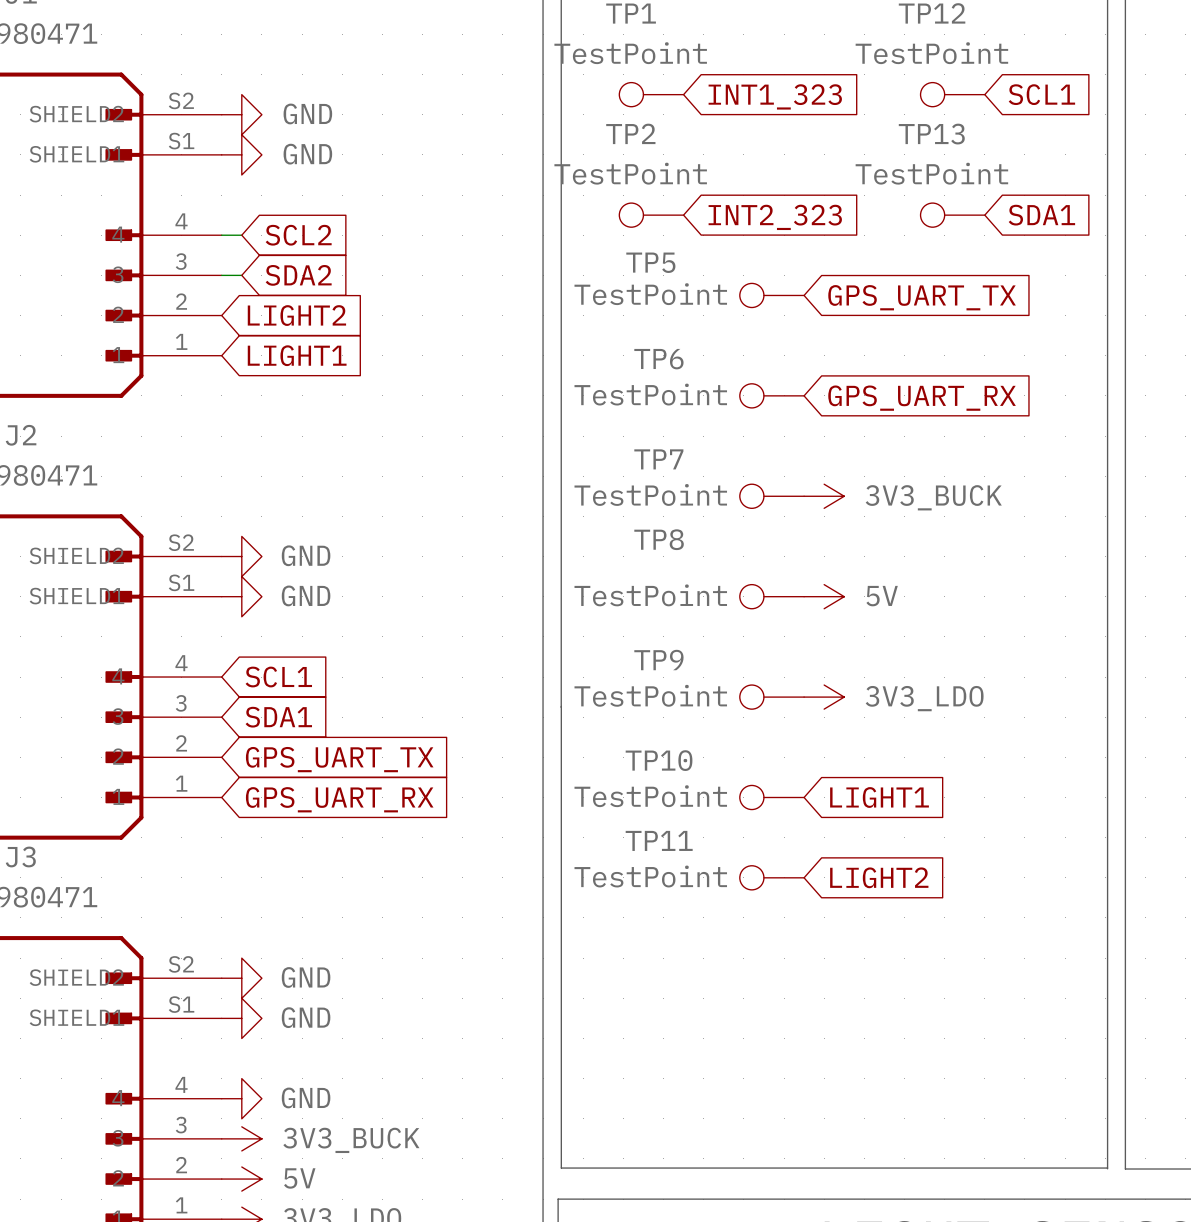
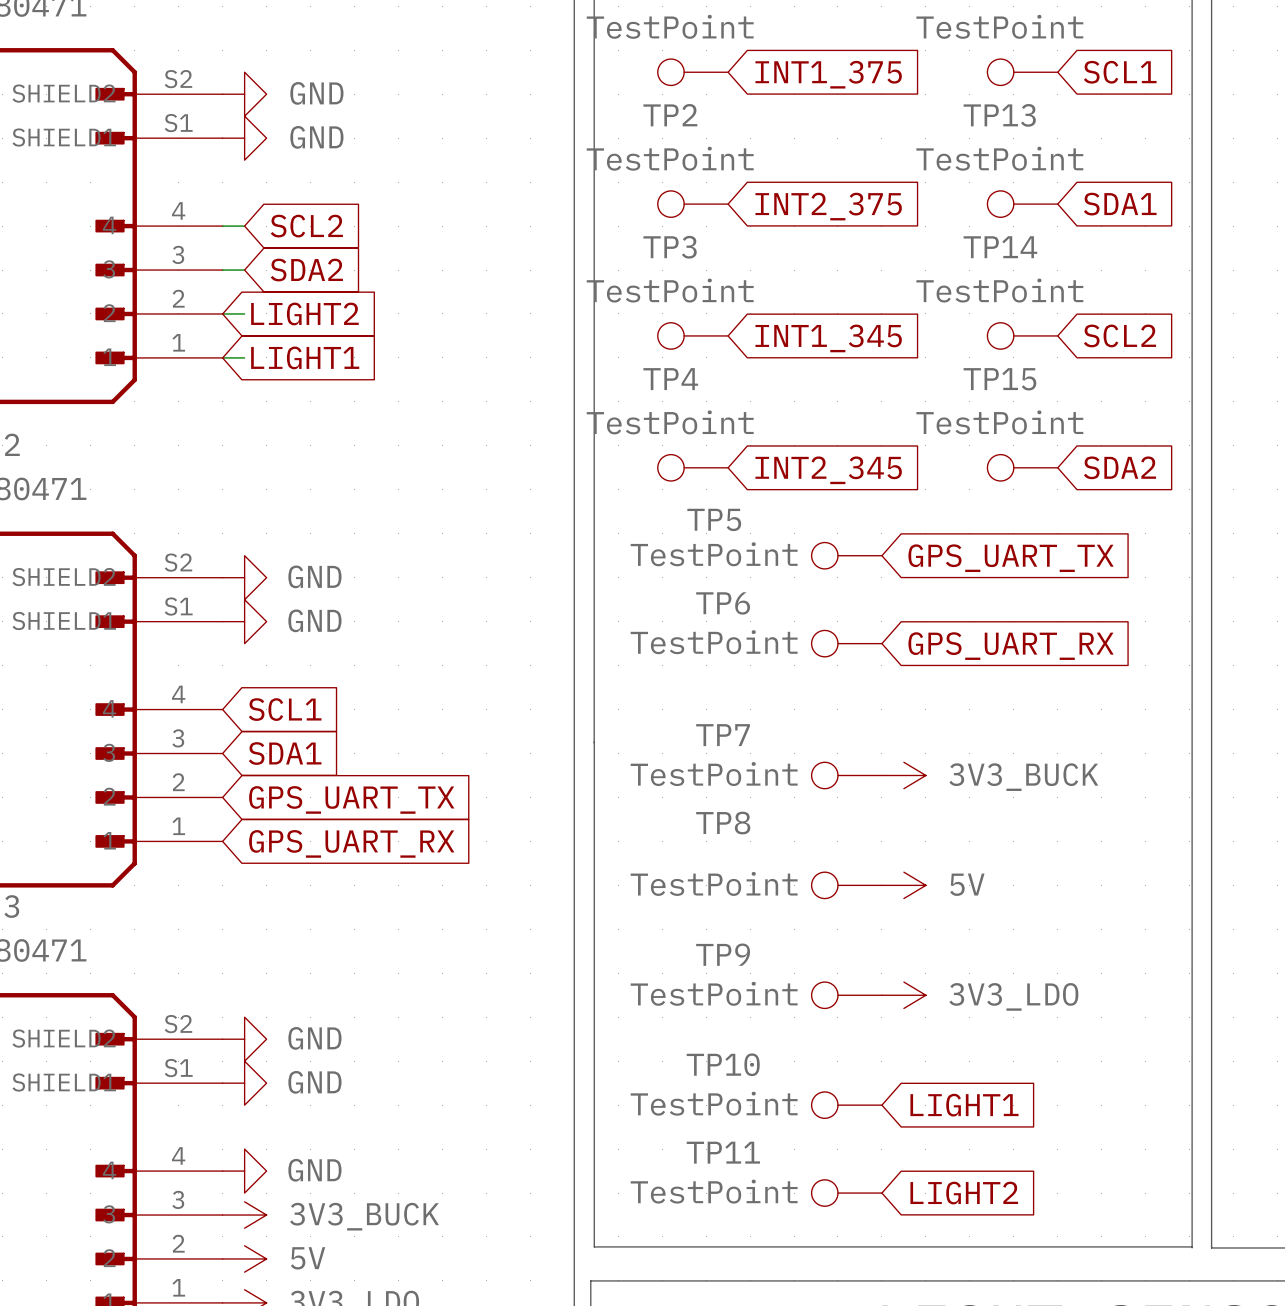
global label: INT1_323 (775, 96) -> INT1_375 (828, 74)
global label: INT2_323 (775, 217) -> INT2_375 (828, 206)
TP5 position: (771, 295) -> (846, 555)
global label position: GPS_UART_TX (922, 297) -> GPS_UART_TX (1011, 558)
wire: none -> (222, 313) (244, 313)
TP3: none -> TestPoint (692, 335)
TP14: none -> TestPoint (1022, 335)
global label: none -> SCL2 (1119, 335)
global label: none -> INT1_345 (828, 338)
wire: none -> (222, 357) (244, 357)
TP6 position: (771, 395) -> (846, 643)
global label position: GPS_UART_RX (922, 398) -> GPS_UART_RX (1011, 646)
TP4: none -> TestPoint (692, 467)
TP15: none -> TestPoint (1022, 467)
global label: none -> SDA2 (1119, 467)
global label: none -> INT2_345 (828, 470)
TP7 position: (771, 496) -> (846, 775)
power symbol position: 3V3_BUCK (824, 496) -> 3V3_BUCK (903, 775)
TP8 position: (771, 596) -> (846, 885)
power symbol position: 5V (824, 596) -> 5V (903, 885)
TP9 position: (771, 697) -> (846, 995)
power symbol position: 3V3_LDO (824, 697) -> 3V3_LDO (903, 995)
TP10 position: (771, 797) -> (846, 1105)
global label position: LIGHT1 (879, 797) -> LIGHT1 (964, 1105)
TP11 position: (771, 877) -> (846, 1193)
global label position: LIGHT2 (879, 877) -> LIGHT2 (964, 1193)

